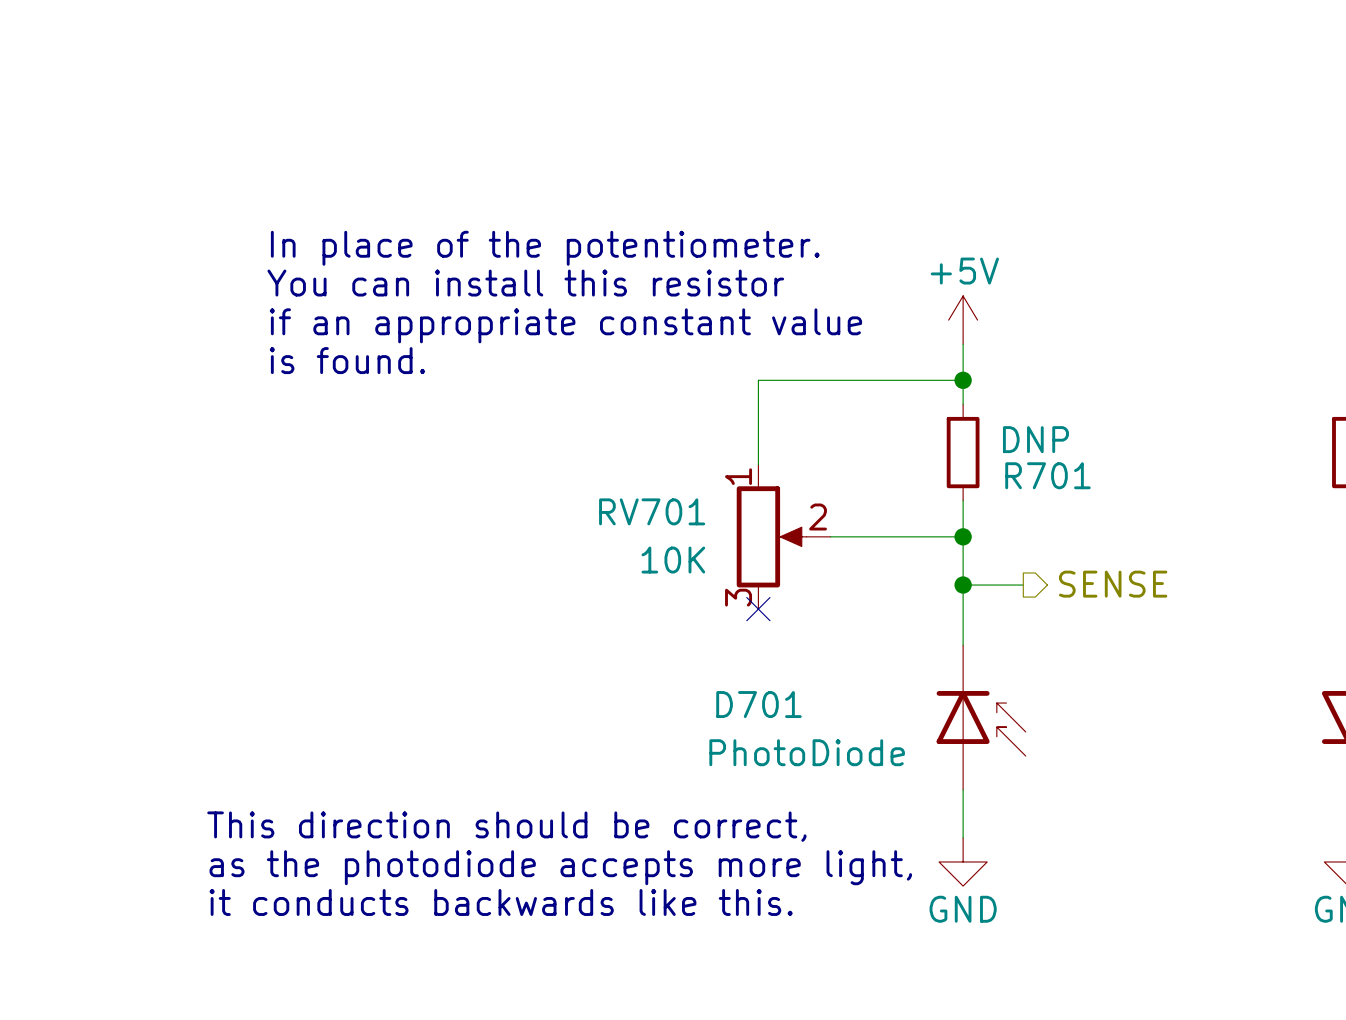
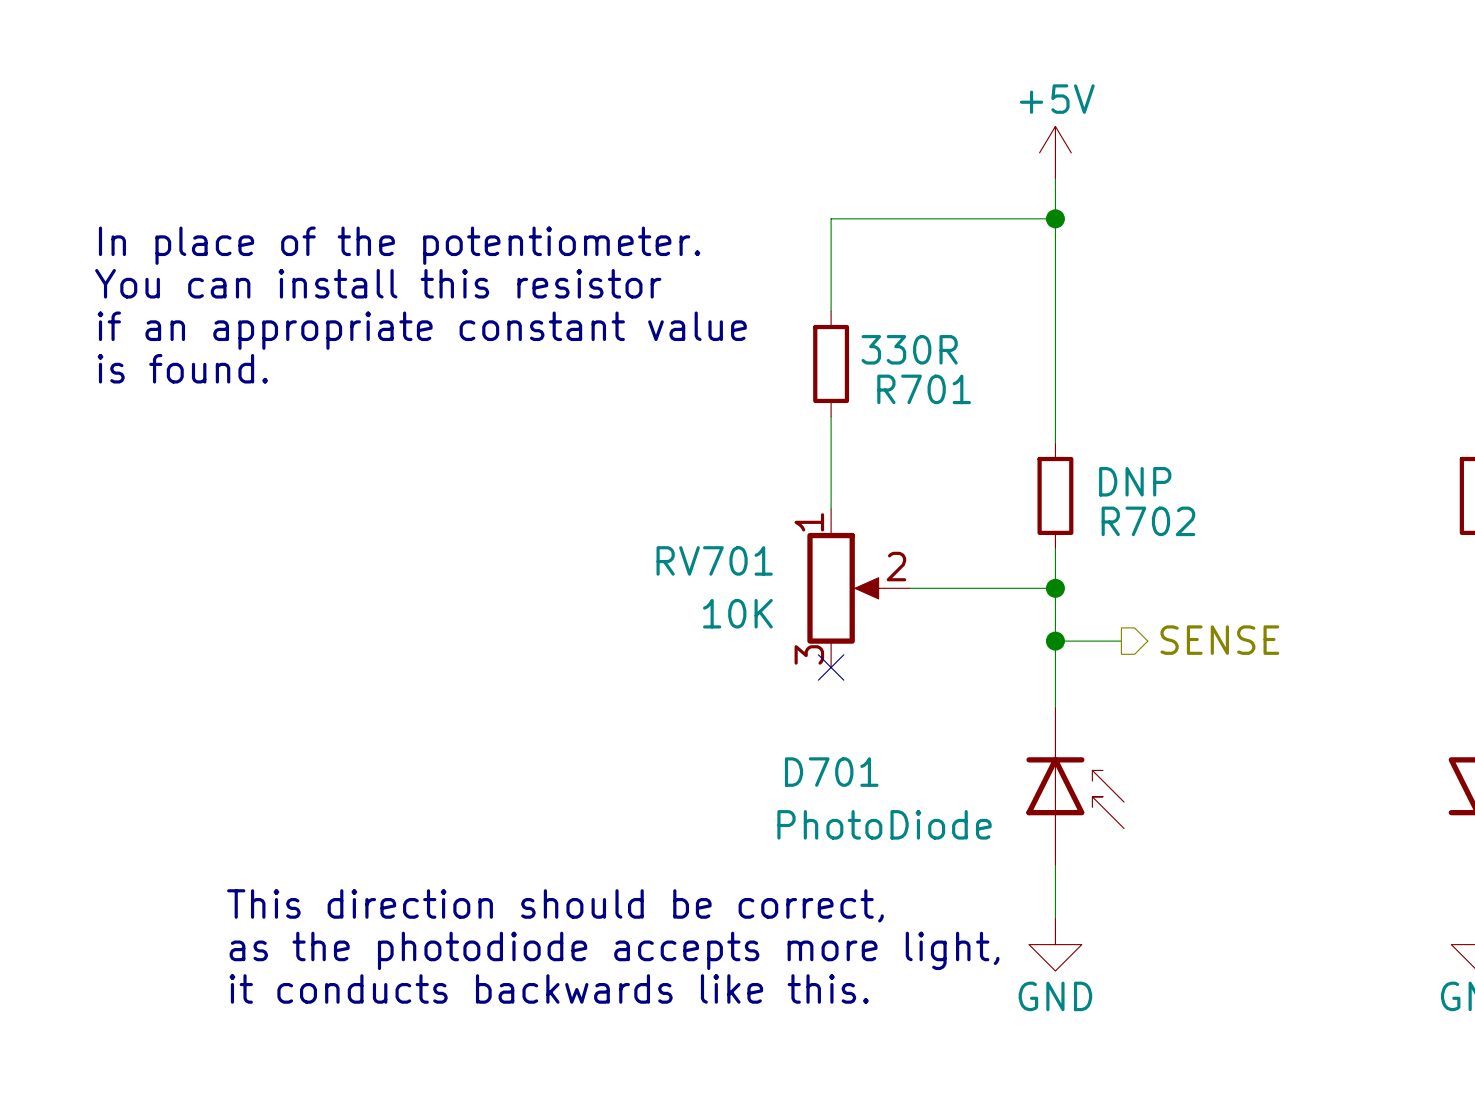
wire: none -> (1055, 179) (1055, 377)
wire: none -> (1055, 218) (831, 218) (831, 311)
junction: none -> (1055, 218)
text position: In place of the potentiometer. (545, 248) -> In place of the potentiometer. (399, 245)
text position: You can install this resistor (525, 283) -> You can install this resistor (378, 283)
power symbol position: +5V (963, 320) -> +5V (1055, 152)
text position: if an appropriate constant value (565, 325) -> if an appropriate constant value (422, 330)
R701: none -> 330R (831, 363)
text position: is found. (347, 360) -> is found. (182, 368)
wire: (758, 380) (963, 380) -> none
junction: (963, 380) -> none
R701 name: R701 (1047, 475) -> R702 (1148, 521)

